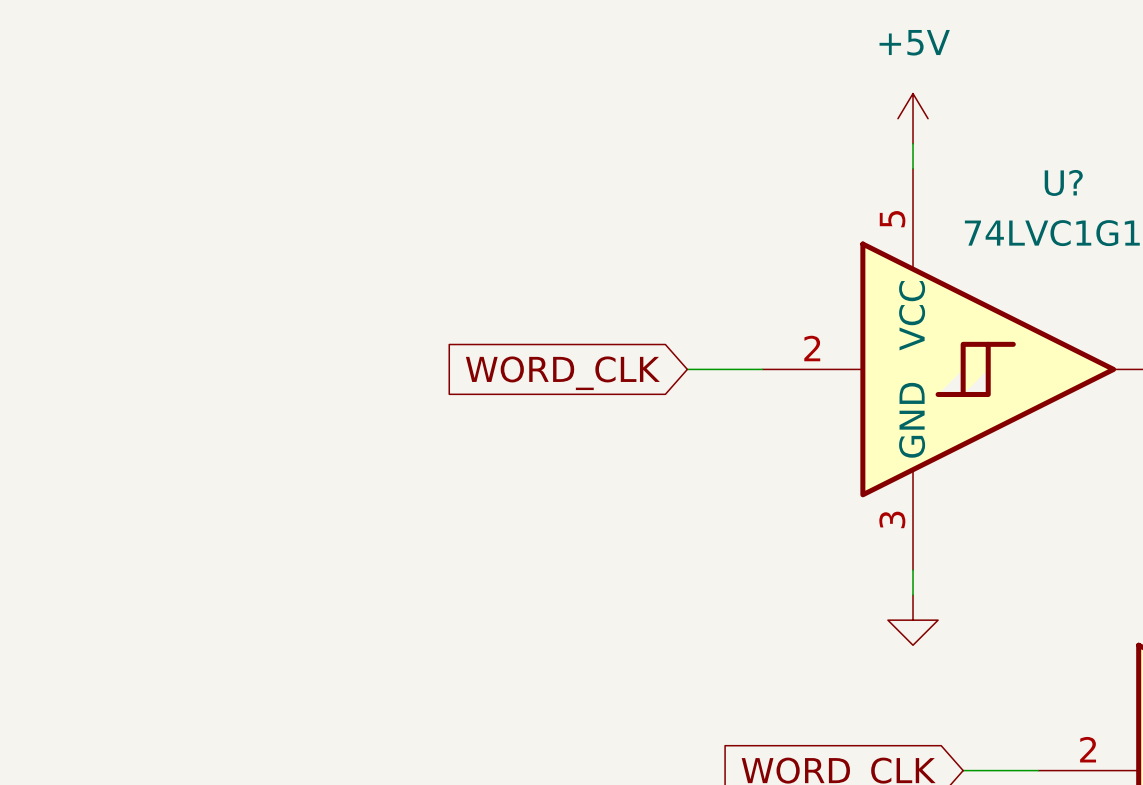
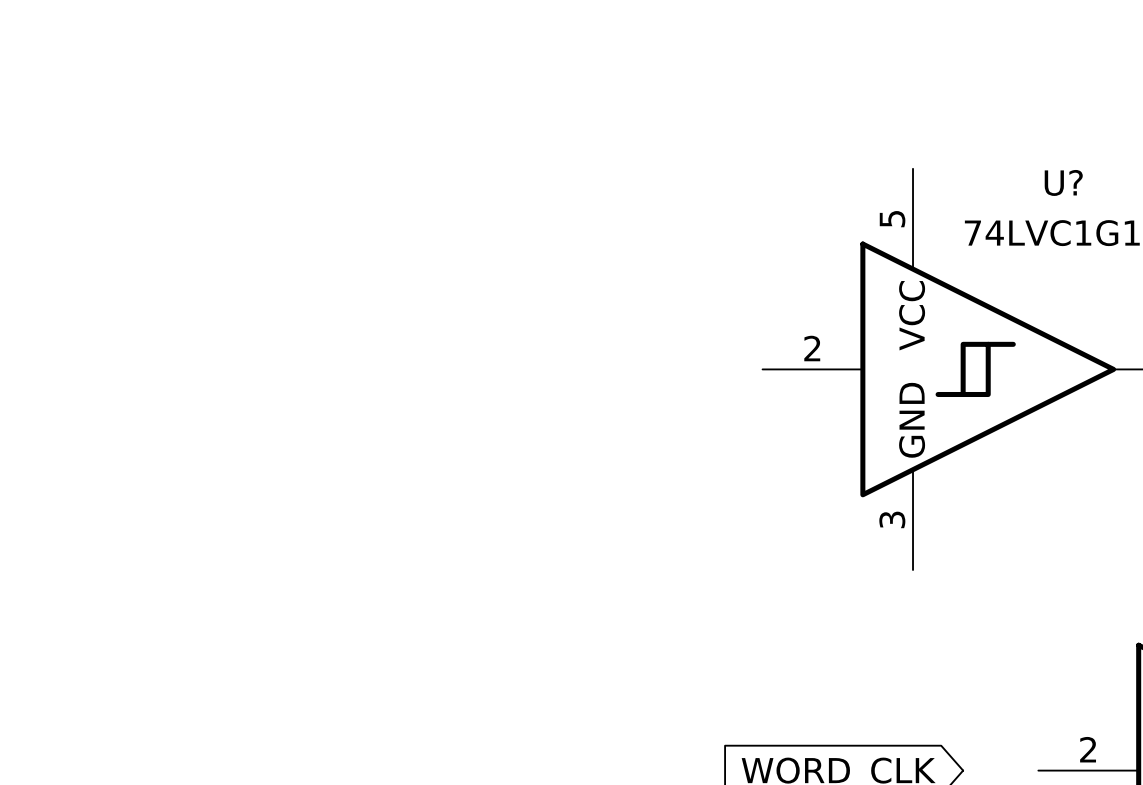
power symbol: +5V (913, 118) -> none
wire: (913, 143) (913, 168) -> none
wire: (687, 369) (762, 369) -> none
global label: WORD_CLK (562, 373) -> none
wire: (913, 570) (913, 595) -> none
power symbol: (913, 620) -> none
wire: (963, 770) (1038, 770) -> none

